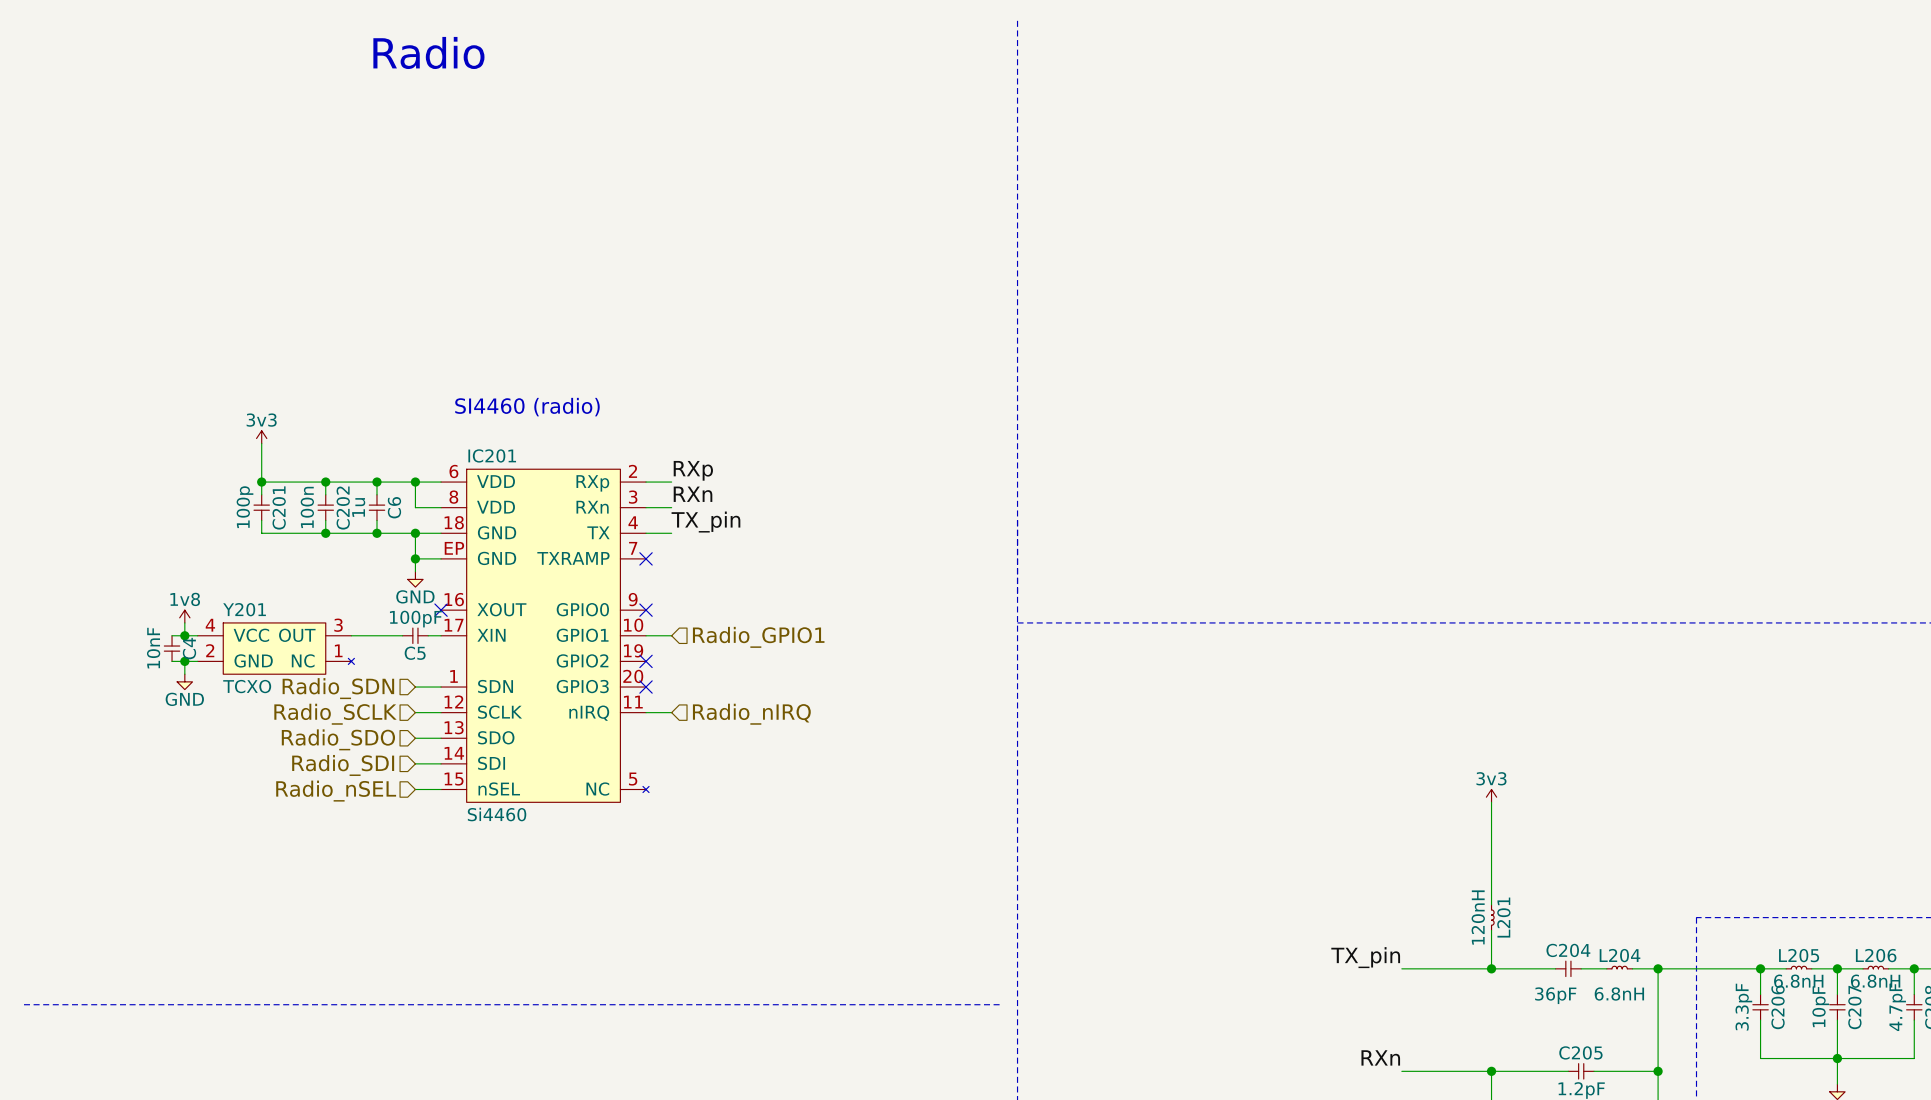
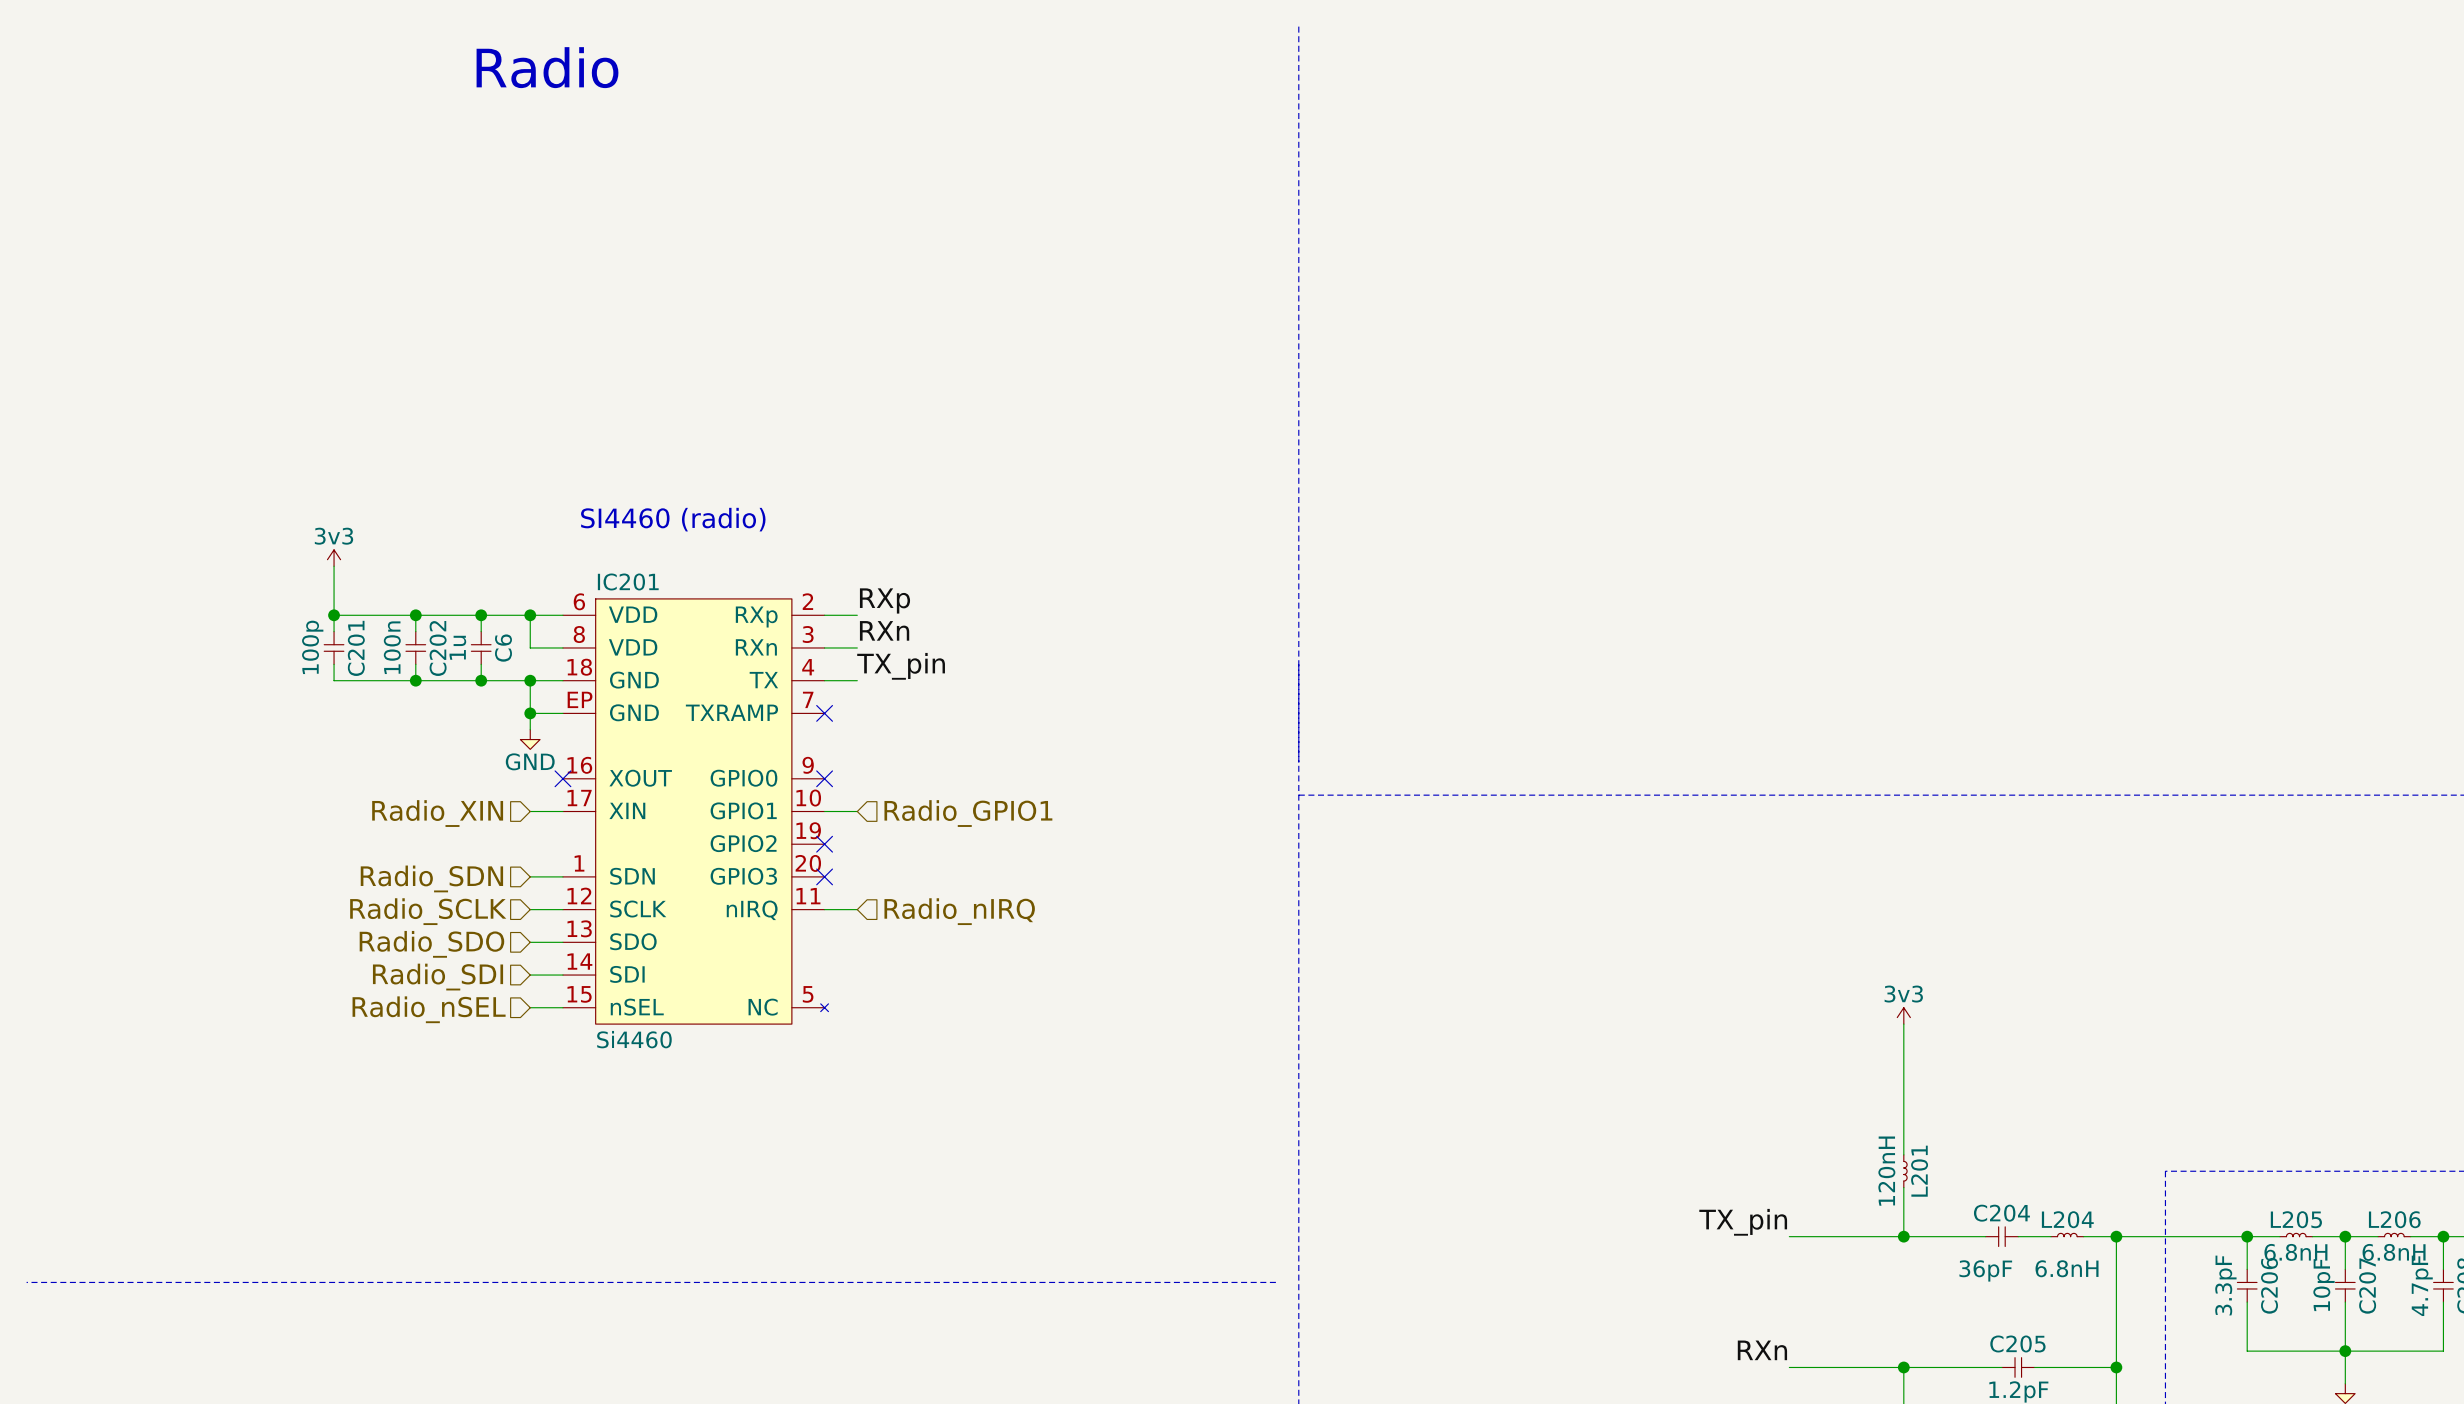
power symbol: 1v8 (184, 616) -> none
wire: (184, 622) (184, 635) -> none
wire: (172, 635) (197, 635) -> none
junction: (184, 635) -> none
wire: (351, 635) (402, 635) -> none
C5: 100pF (415, 635) -> none
hierarchical label: none -> Radio_XIN (437, 813)
C4: 10nF (172, 648) -> none
Y201: TCXO (276, 648) -> none
wire: (172, 661) (197, 661) -> none
wire: (184, 661) (184, 674) -> none
junction: (184, 661) -> none
power symbol: GND (184, 681) -> none

